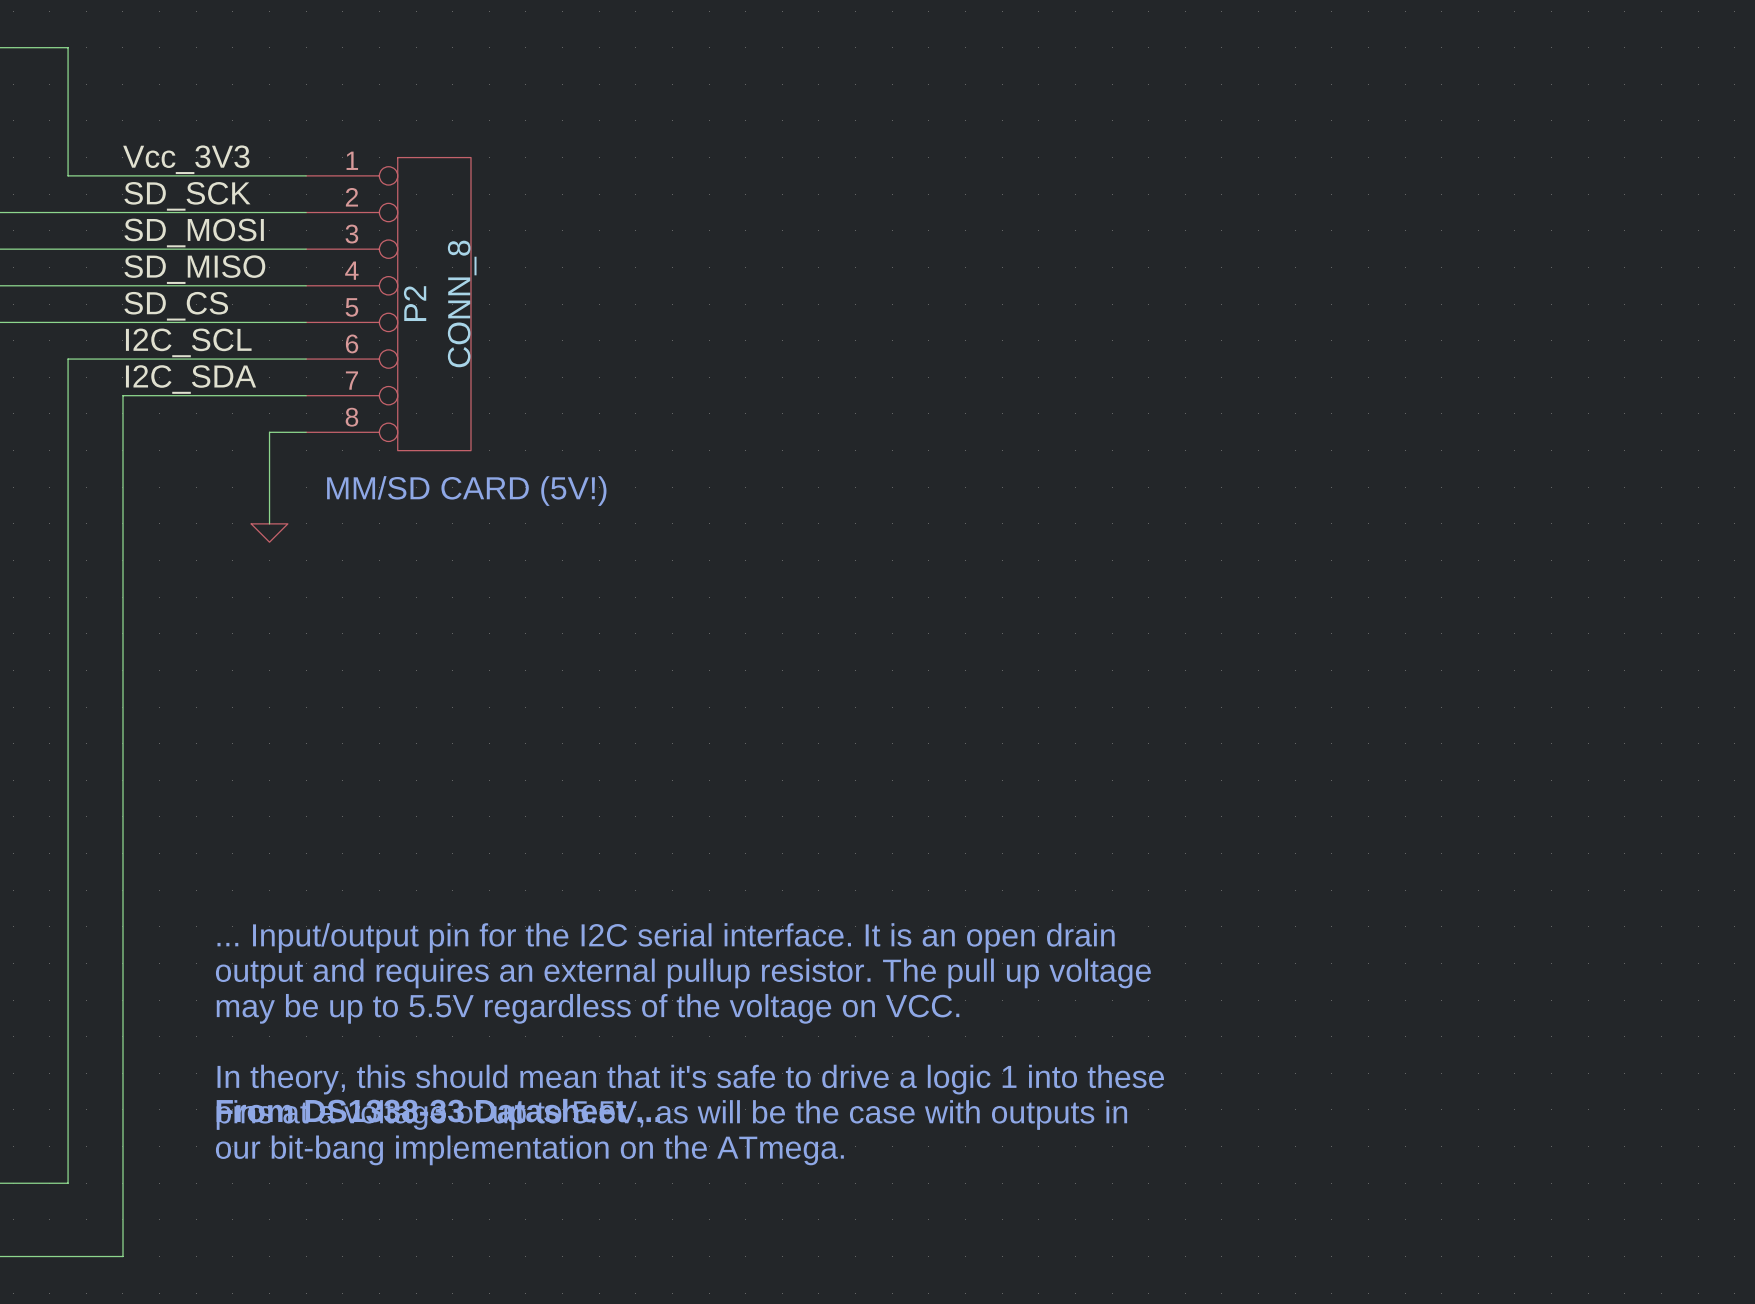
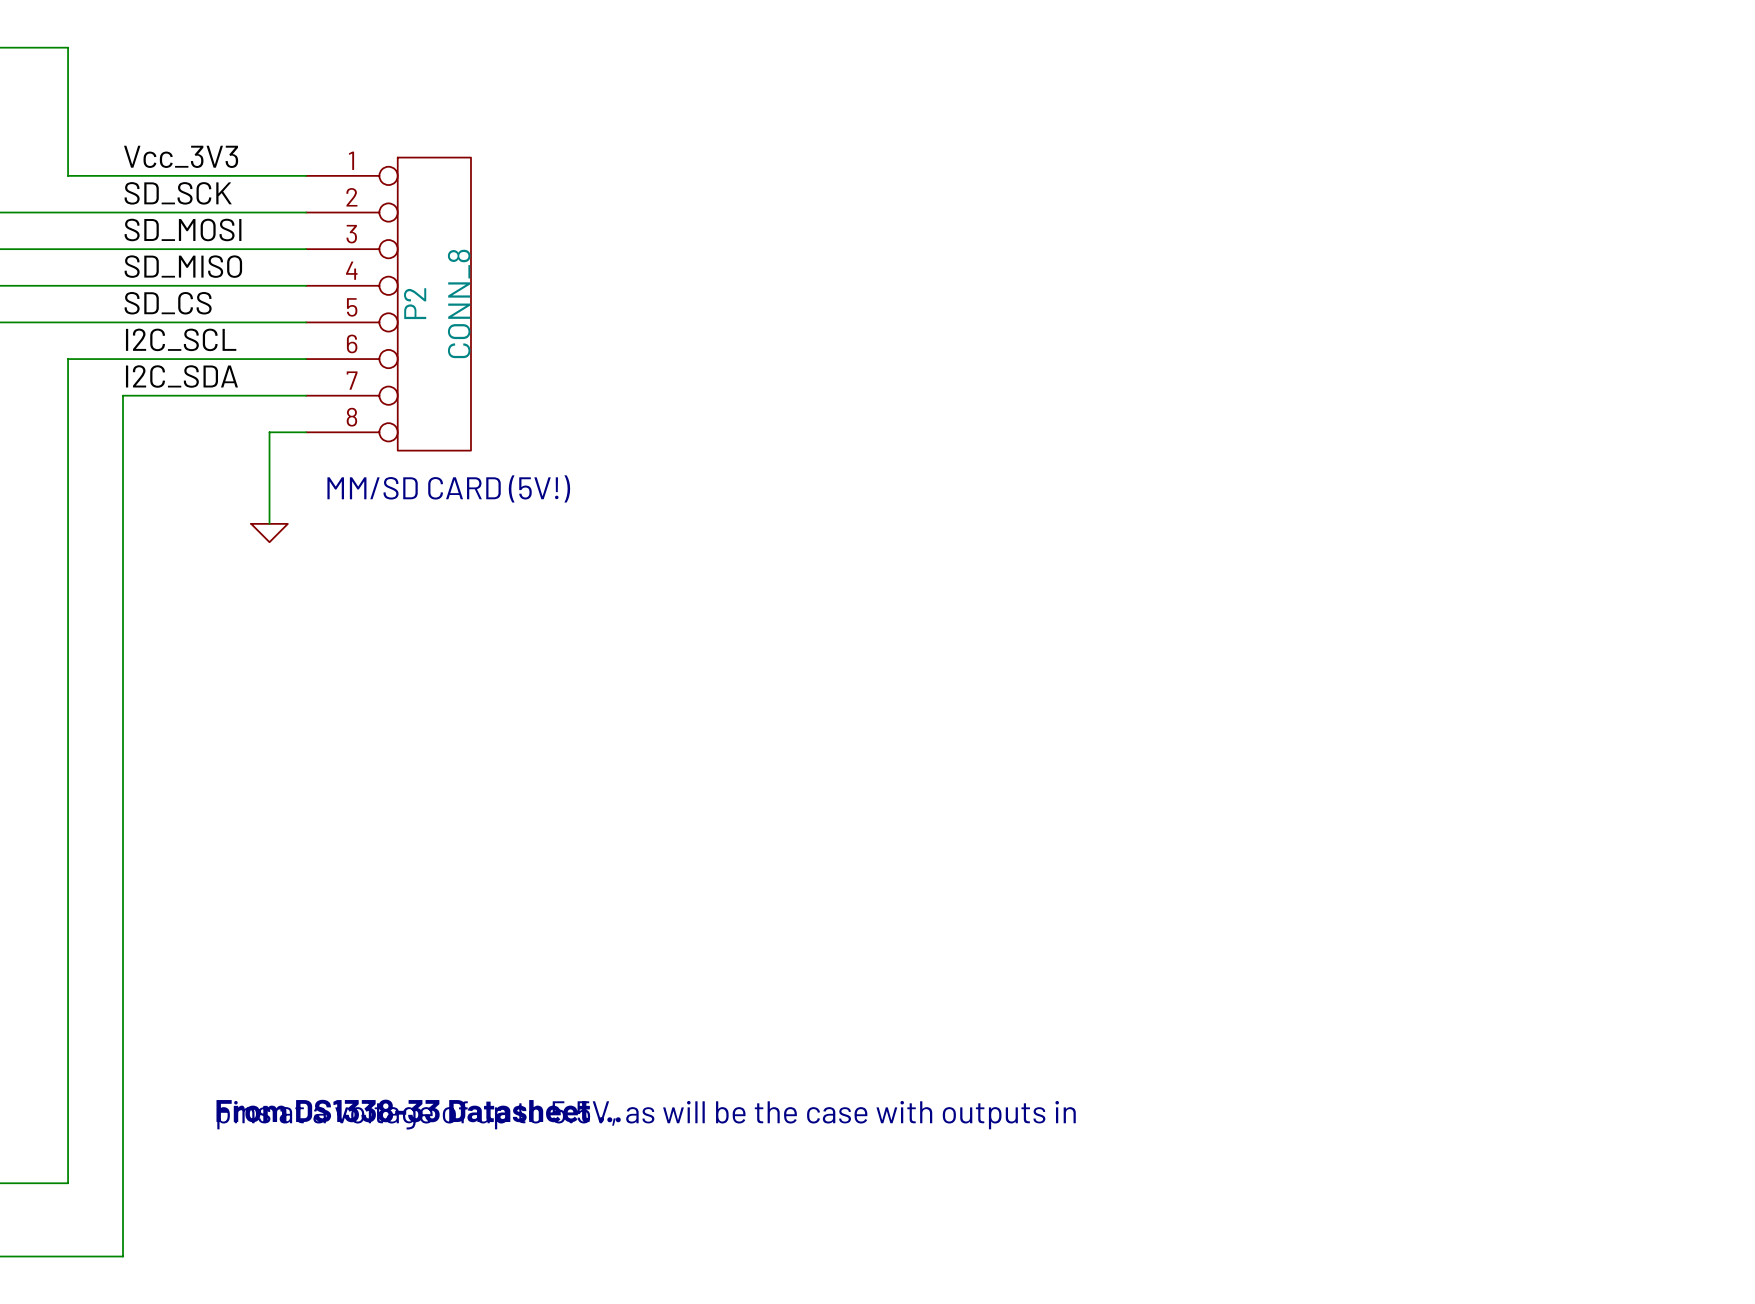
text: ... Input/output pin for the I2C serial interface. It is an open drain (666, 938) -> none
text: output and requires an external pullup resistor. The pull up voltage (683, 973) -> none
text: may be up to 5.5V regardless of the voltage on VCC. (588, 1008) -> none
text: In theory, this should mean that it's safe to drive a logic 1 into these (690, 1079) -> none
text: our bit-bang implementation on the ATmega. (529, 1150) -> none

